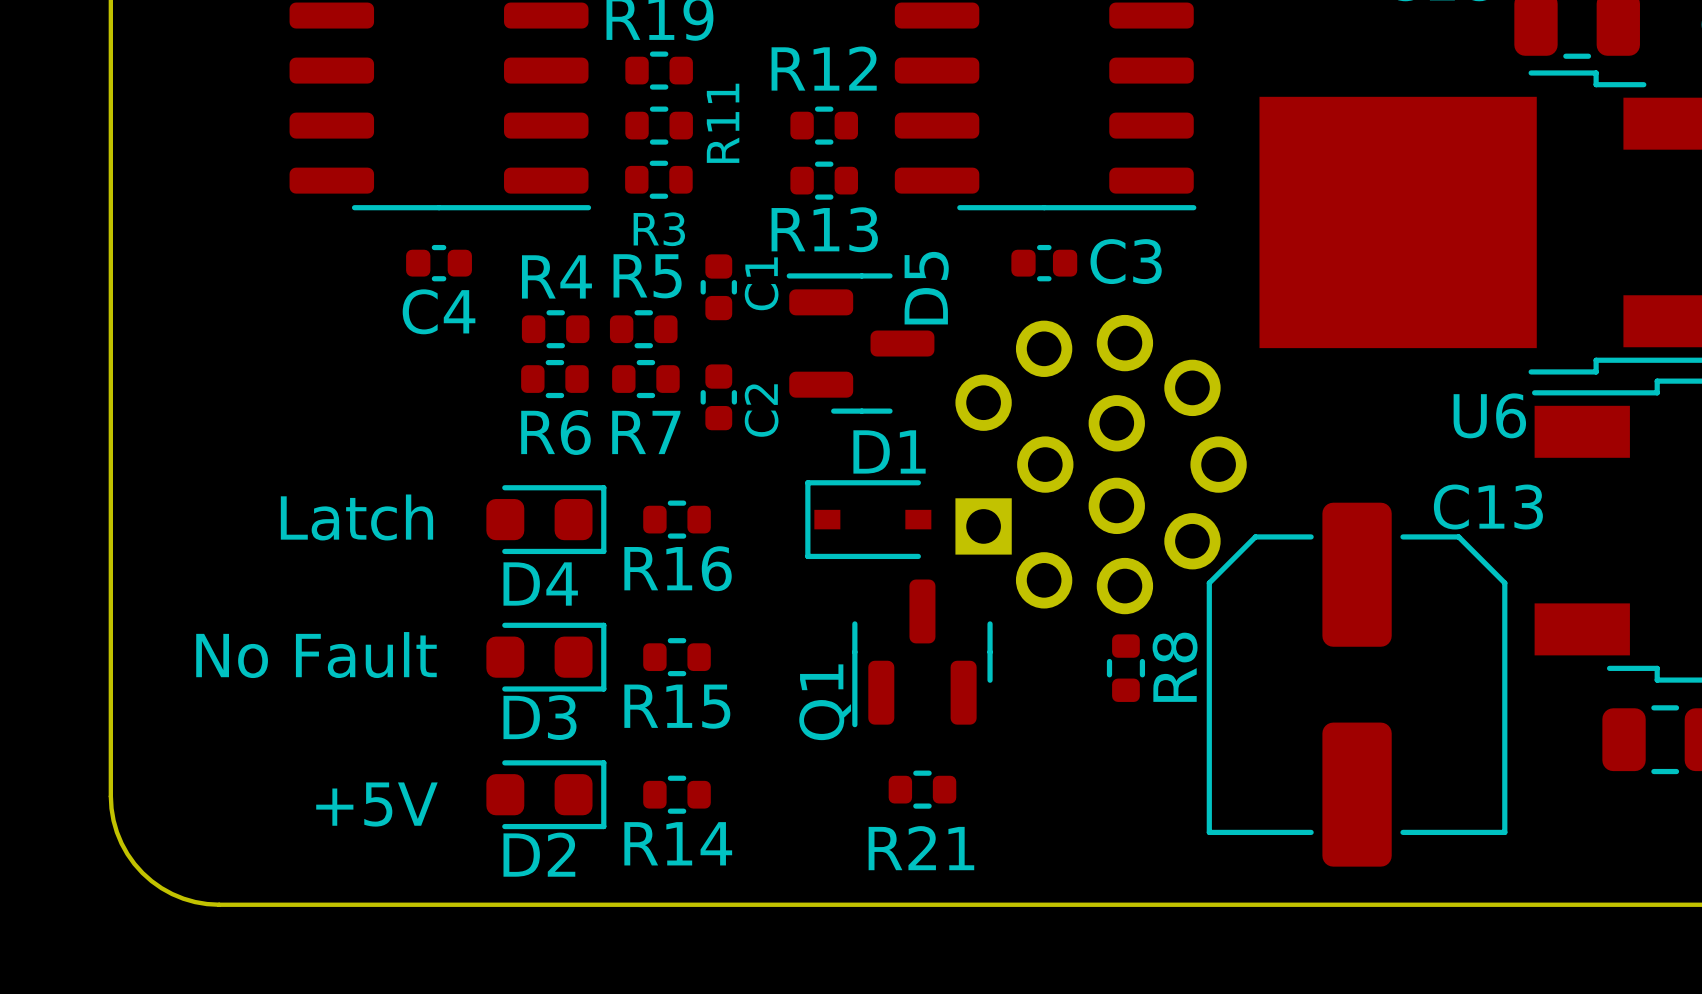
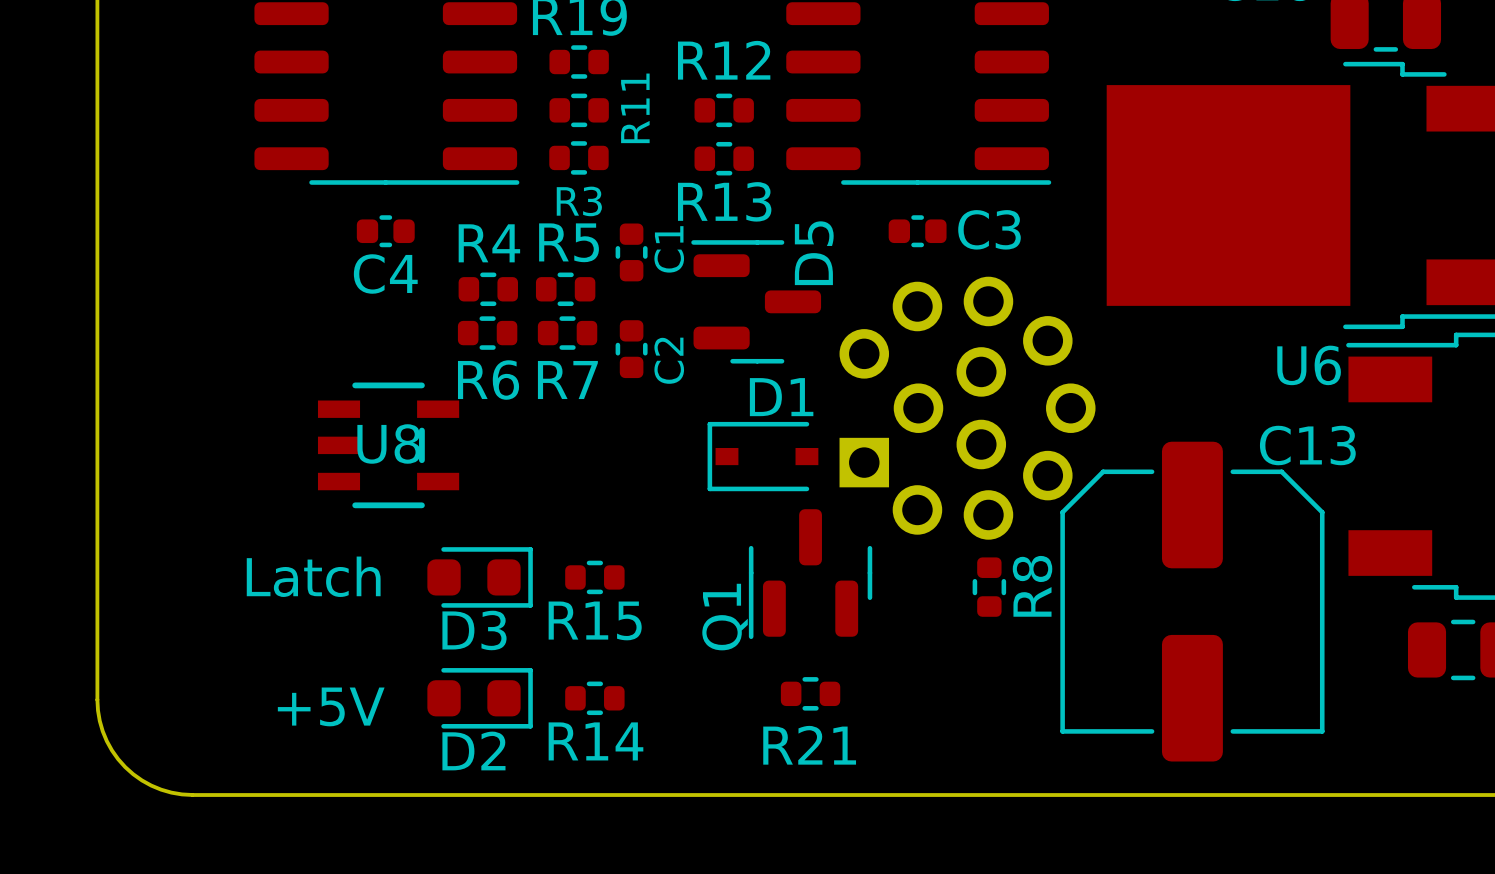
U8: none -> (388, 445)
text: Latch (356, 517) -> none
D4: (546, 519) -> none
R16: (677, 519) -> none
text: No Fault (316, 655) -> Latch (313, 576)

